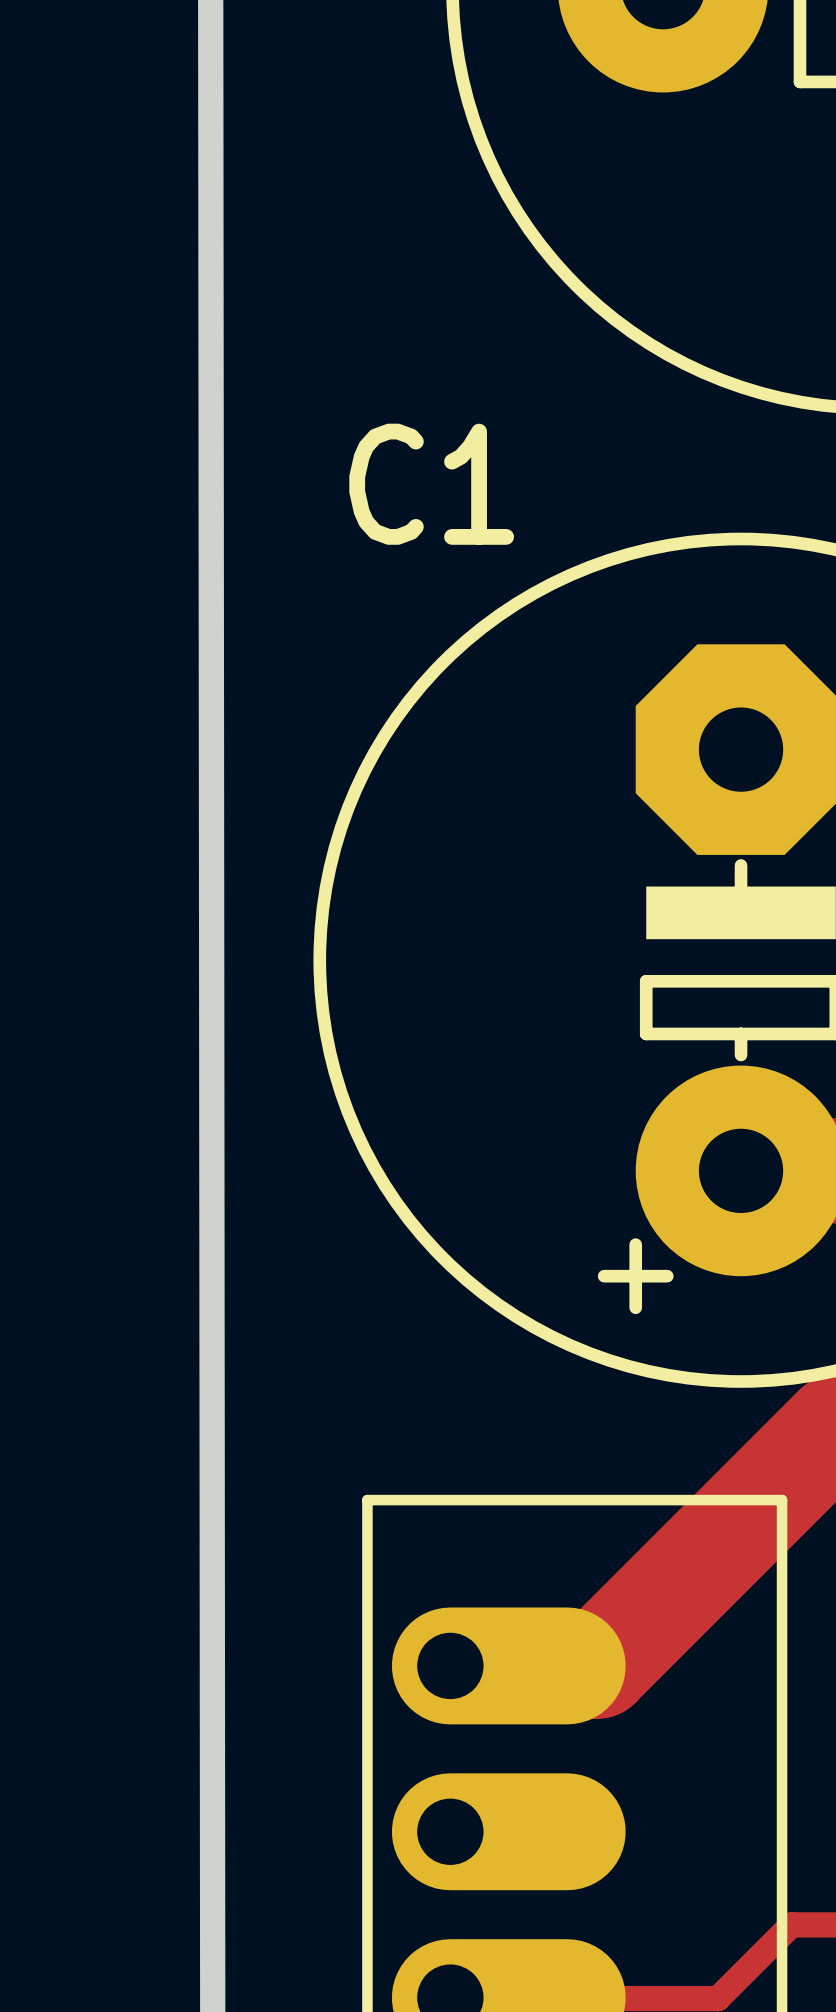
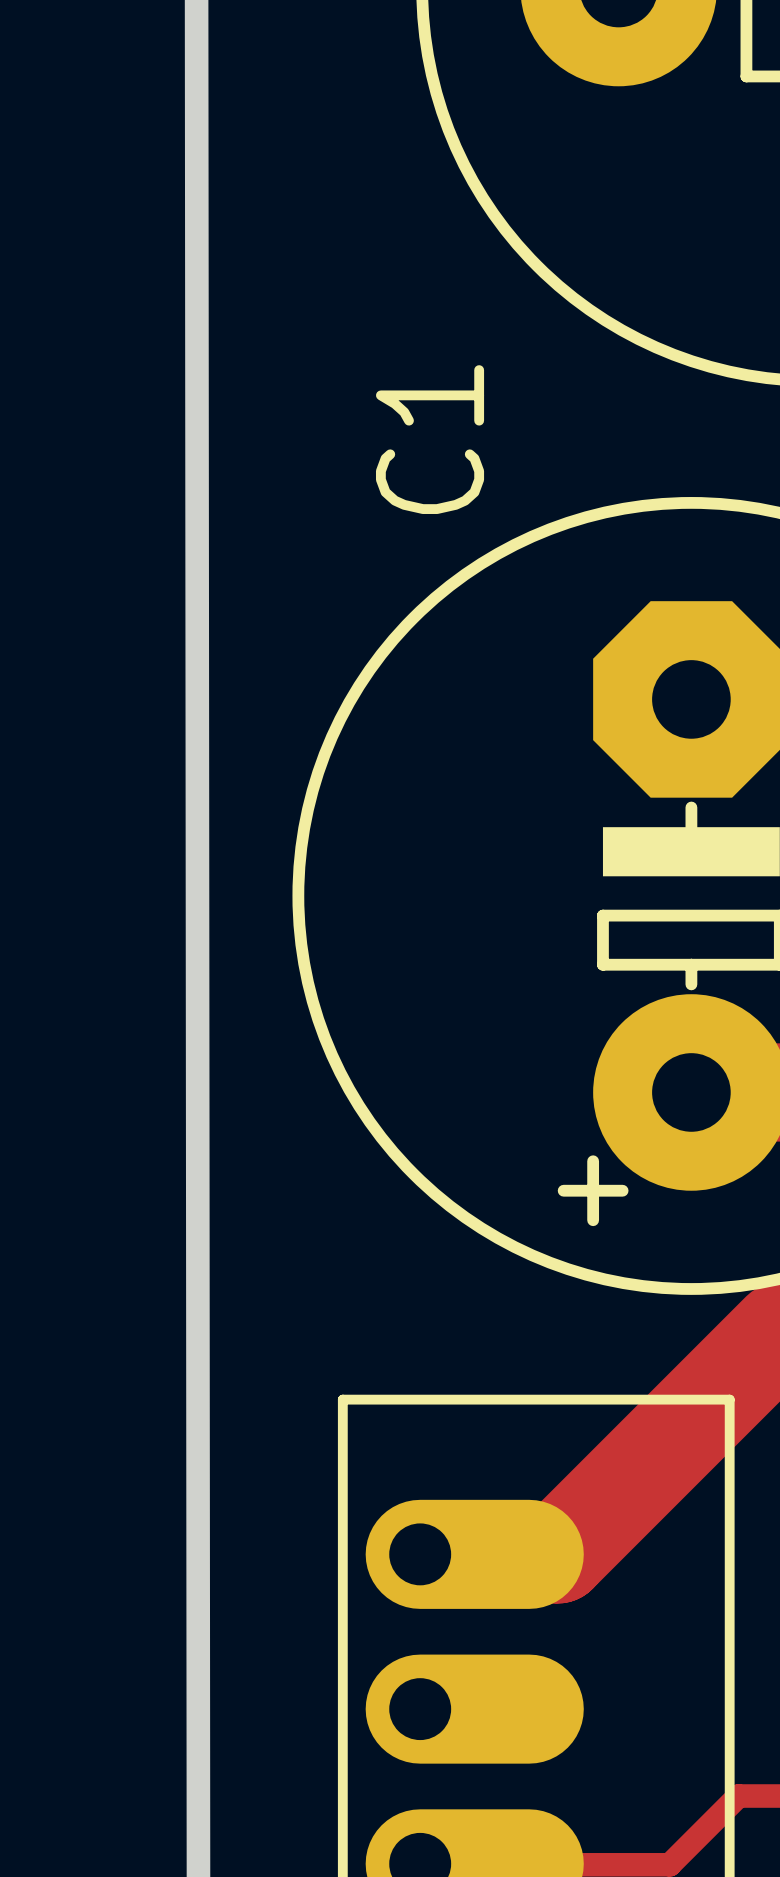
C1 name rotation: 0° (431, 484) -> 90° counterclockwise (430, 439)

